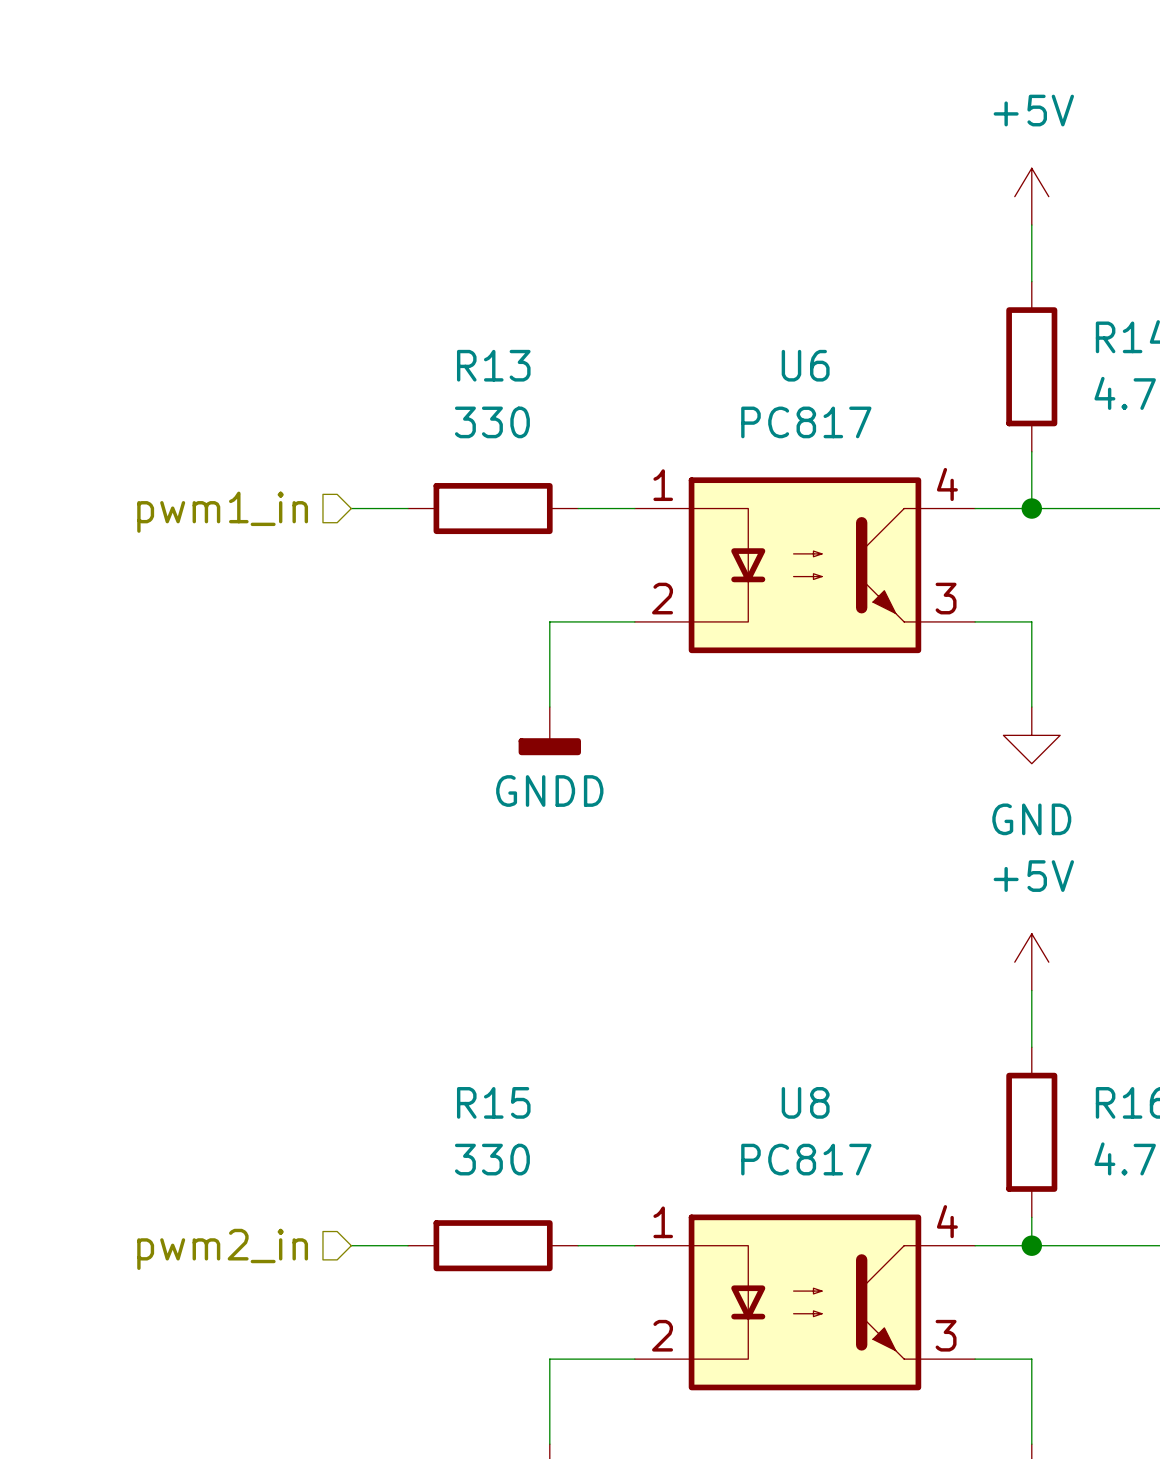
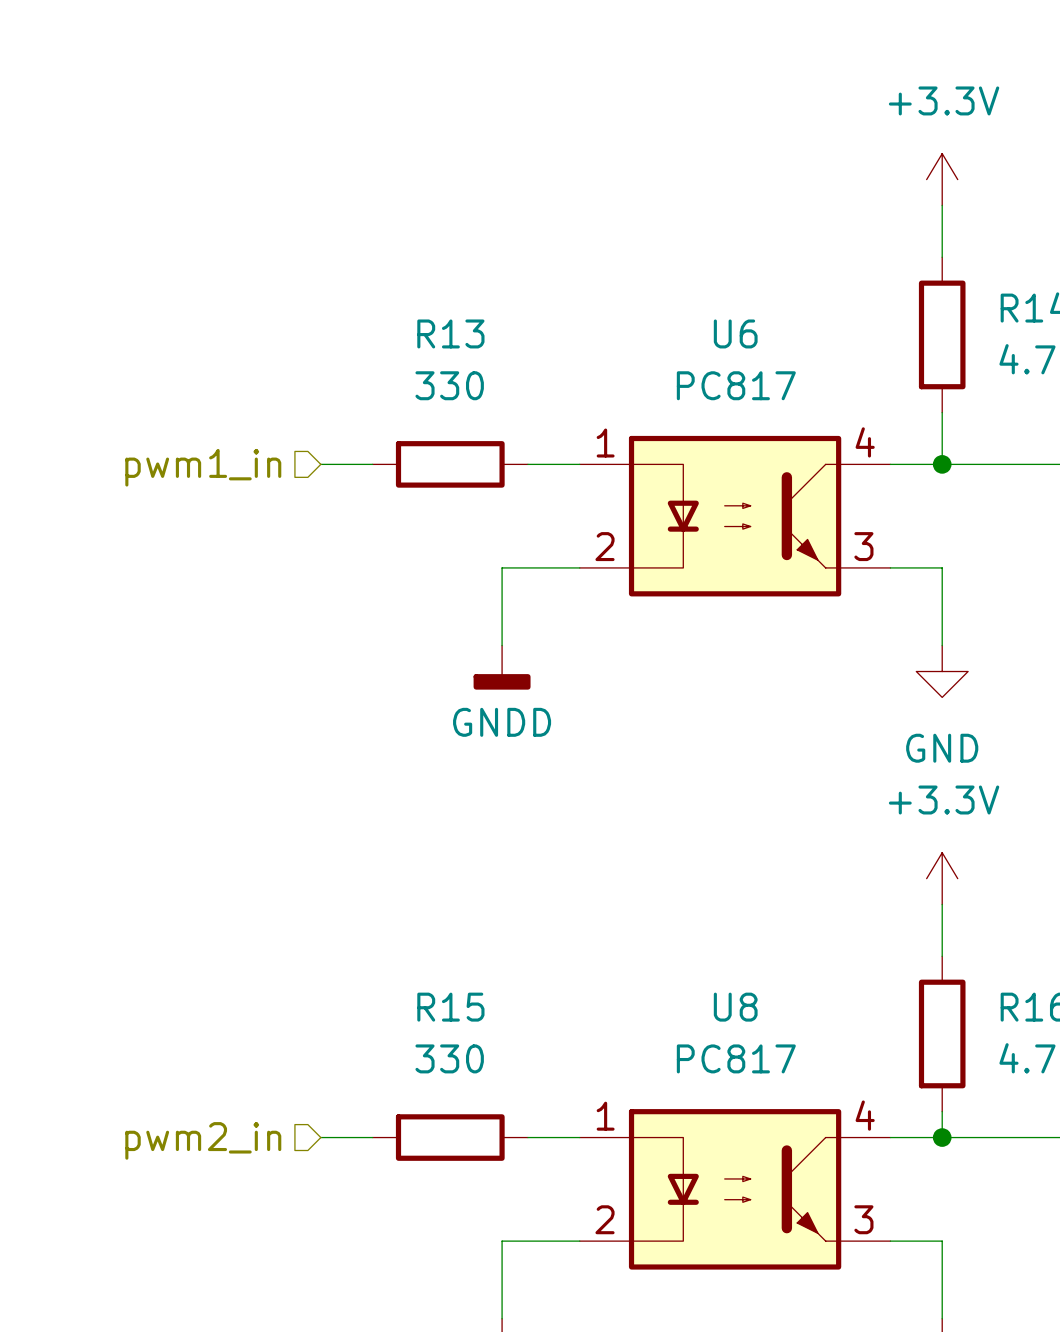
power symbol: +5V (1031, 196) -> +3.3V (942, 179)
power symbol: +5V (1031, 962) -> +3.3V (942, 878)

